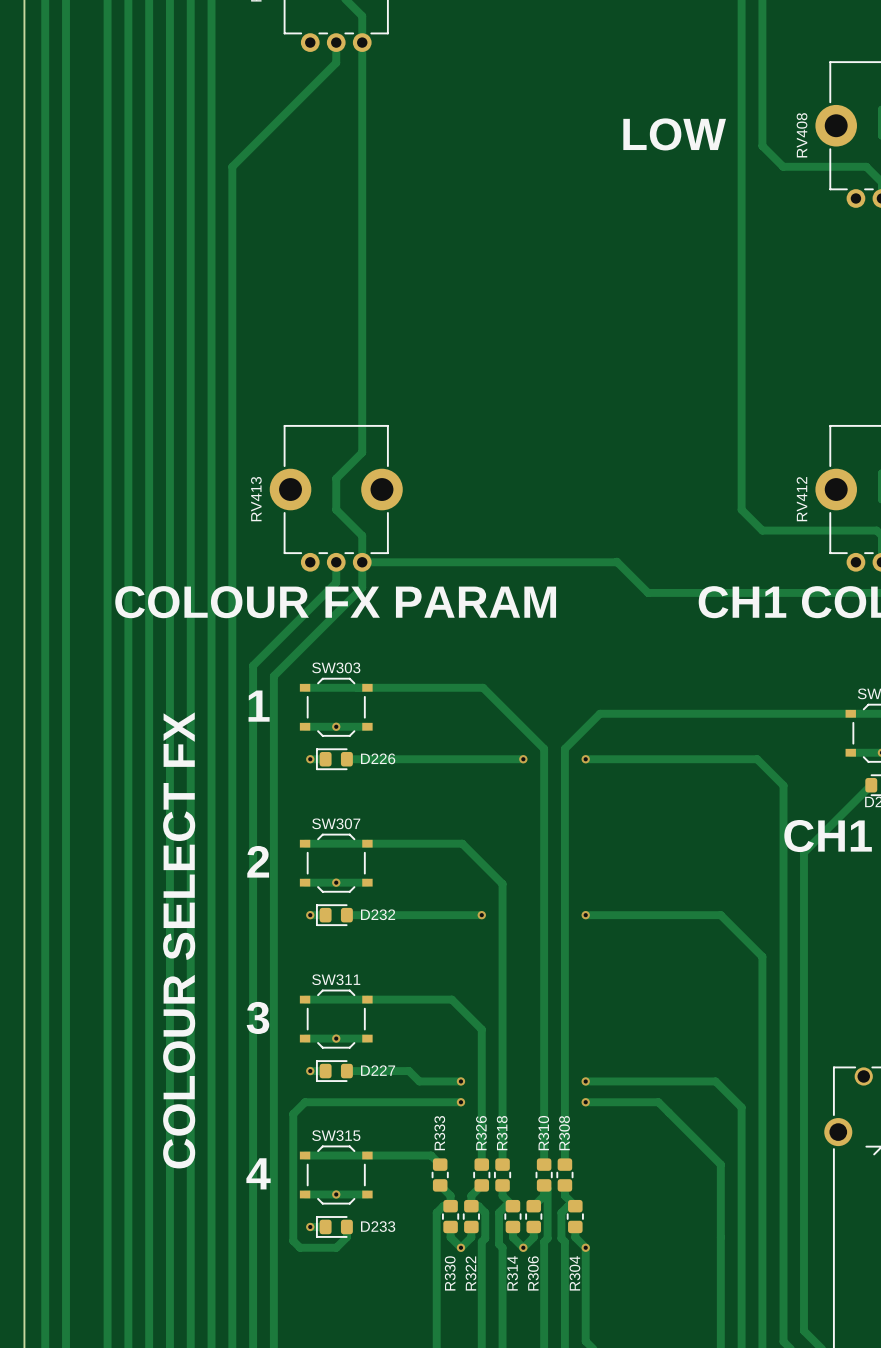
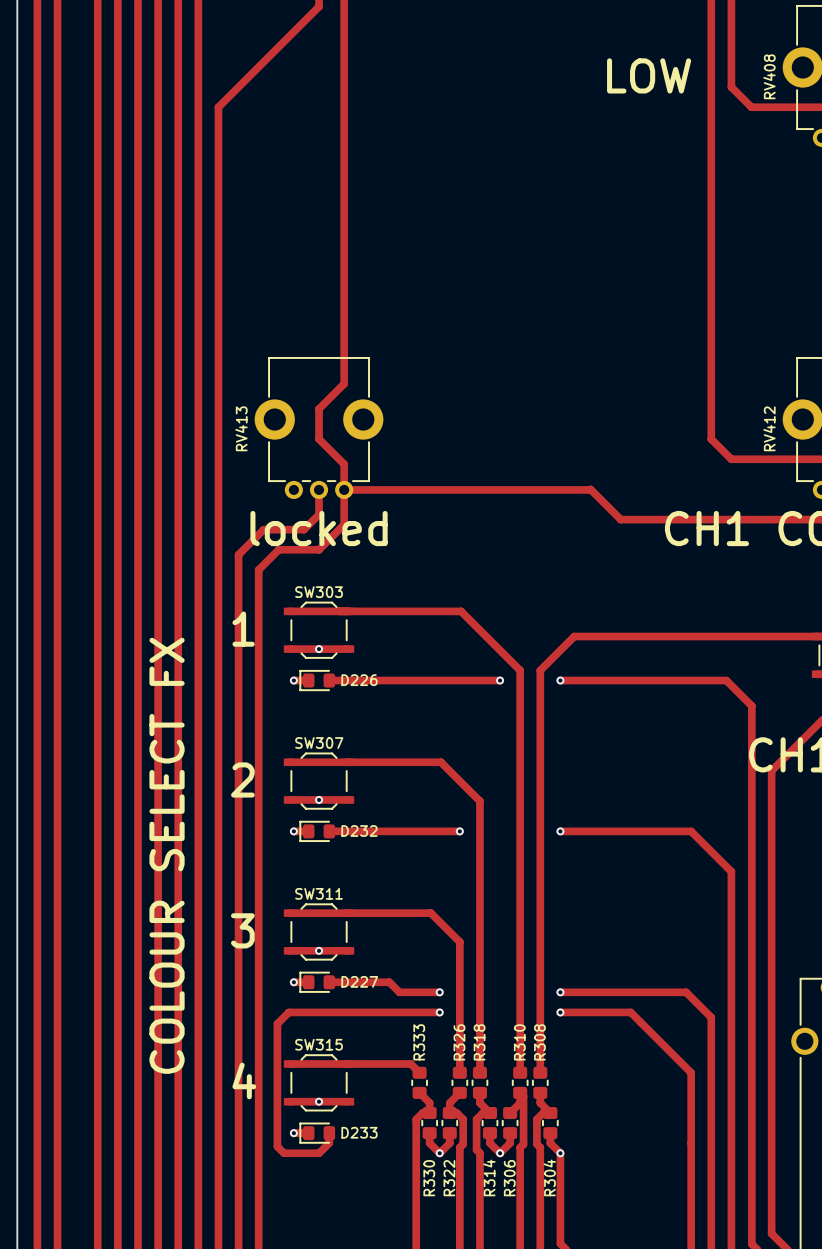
track: (336, 582) (294, 624) -> (344, 514) (344, 524) (319, 549) (278, 549)
track: none -> (319, 509) (319, 514) (303, 529) (263, 529) (238, 554) (238, 590)
track: (362, 587) (273, 676) -> none
text: COLOUR FX PARAM (335, 602) -> locked (319, 528)
track: (273, 644) (253, 665) -> (258, 569) (258, 600)

